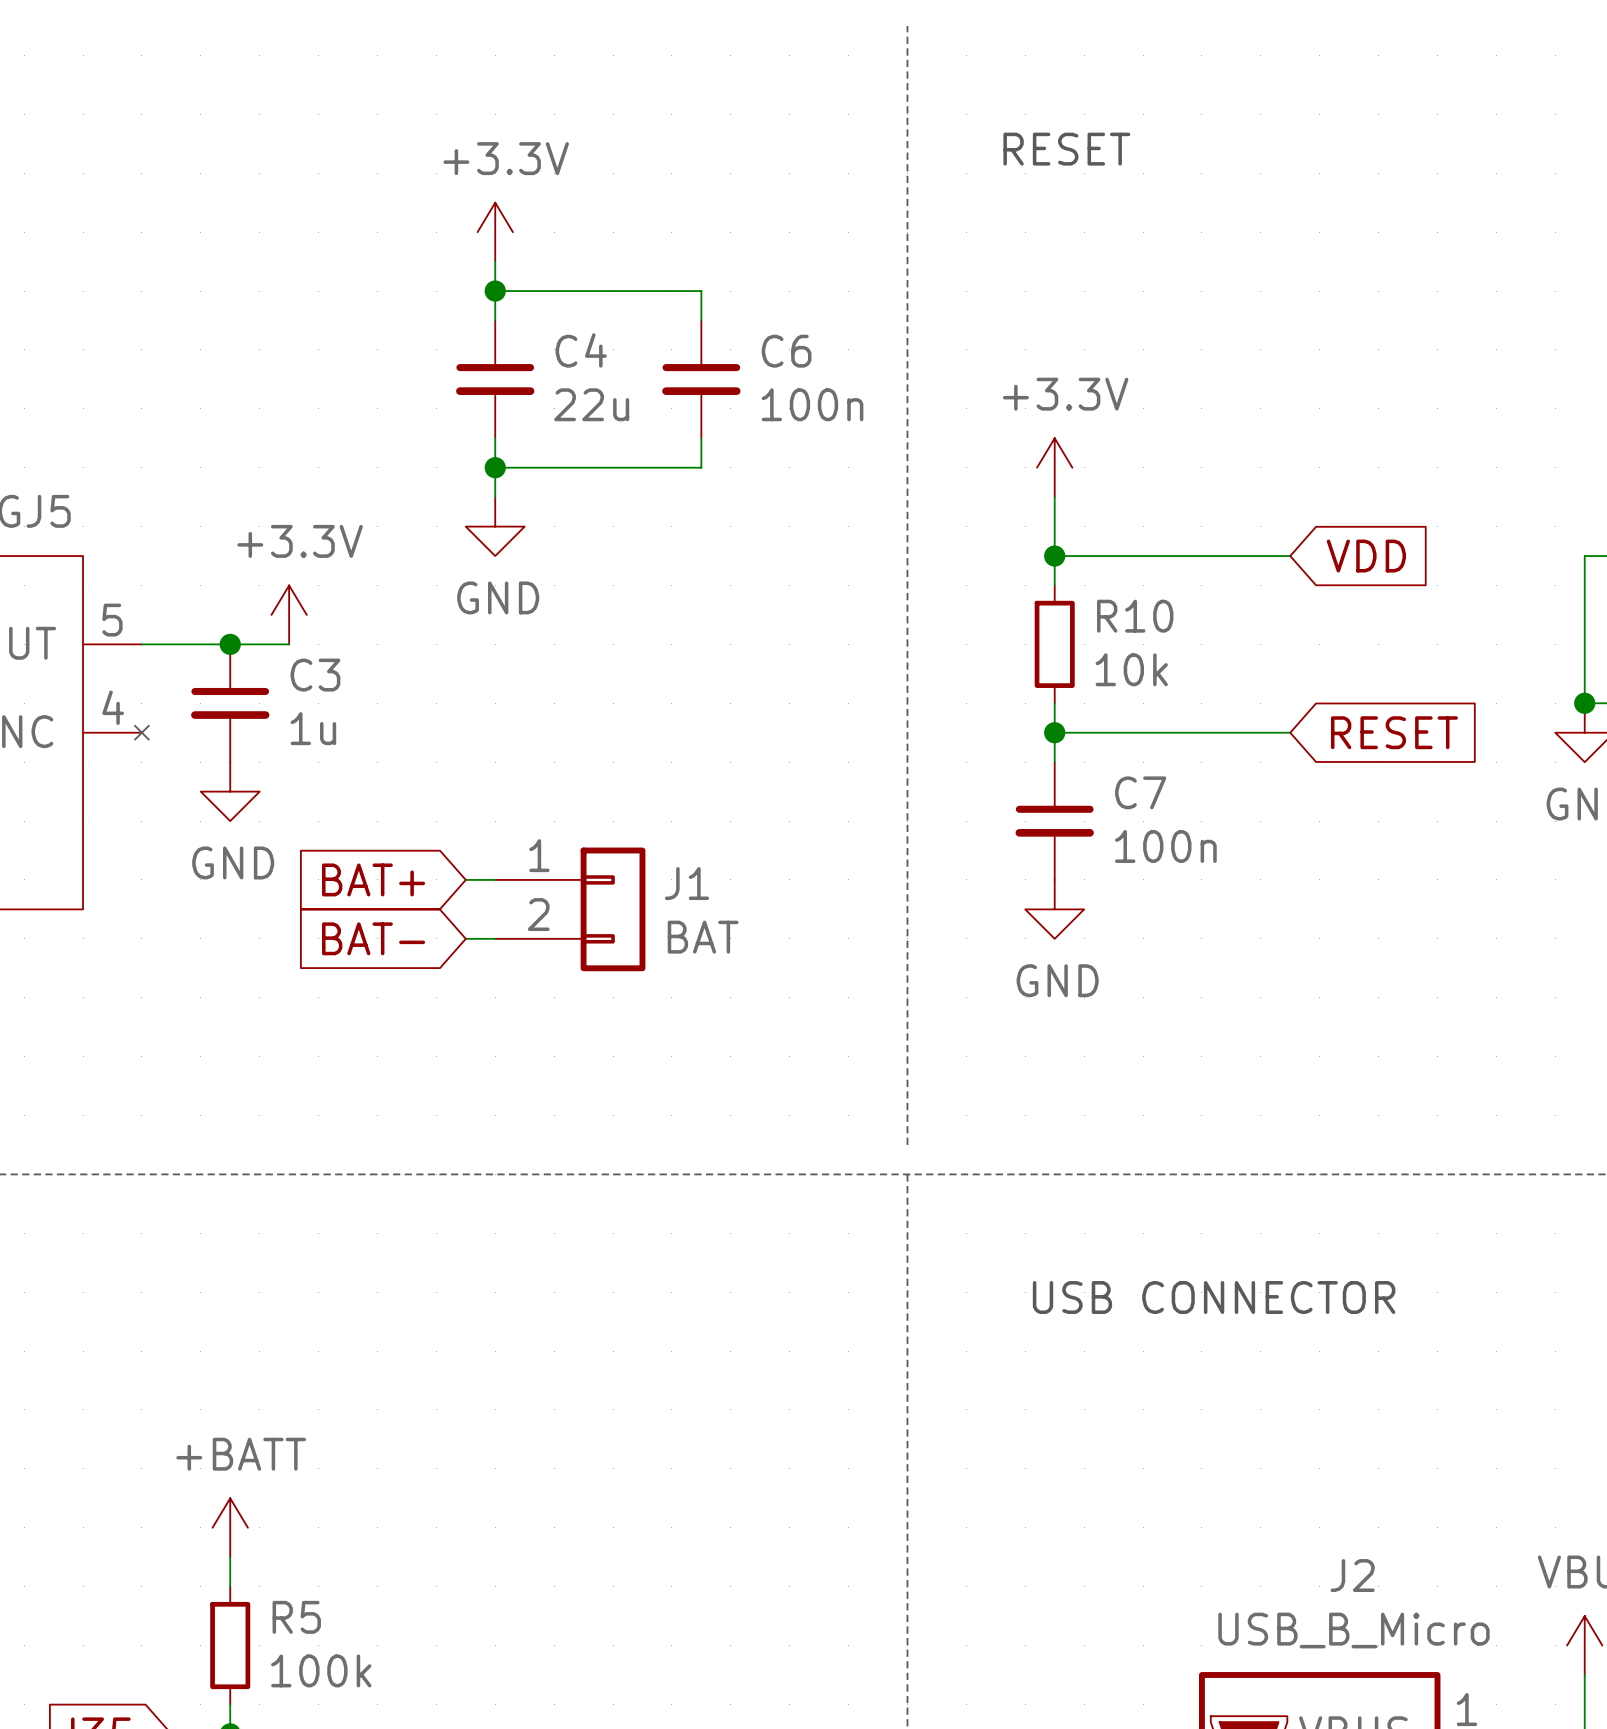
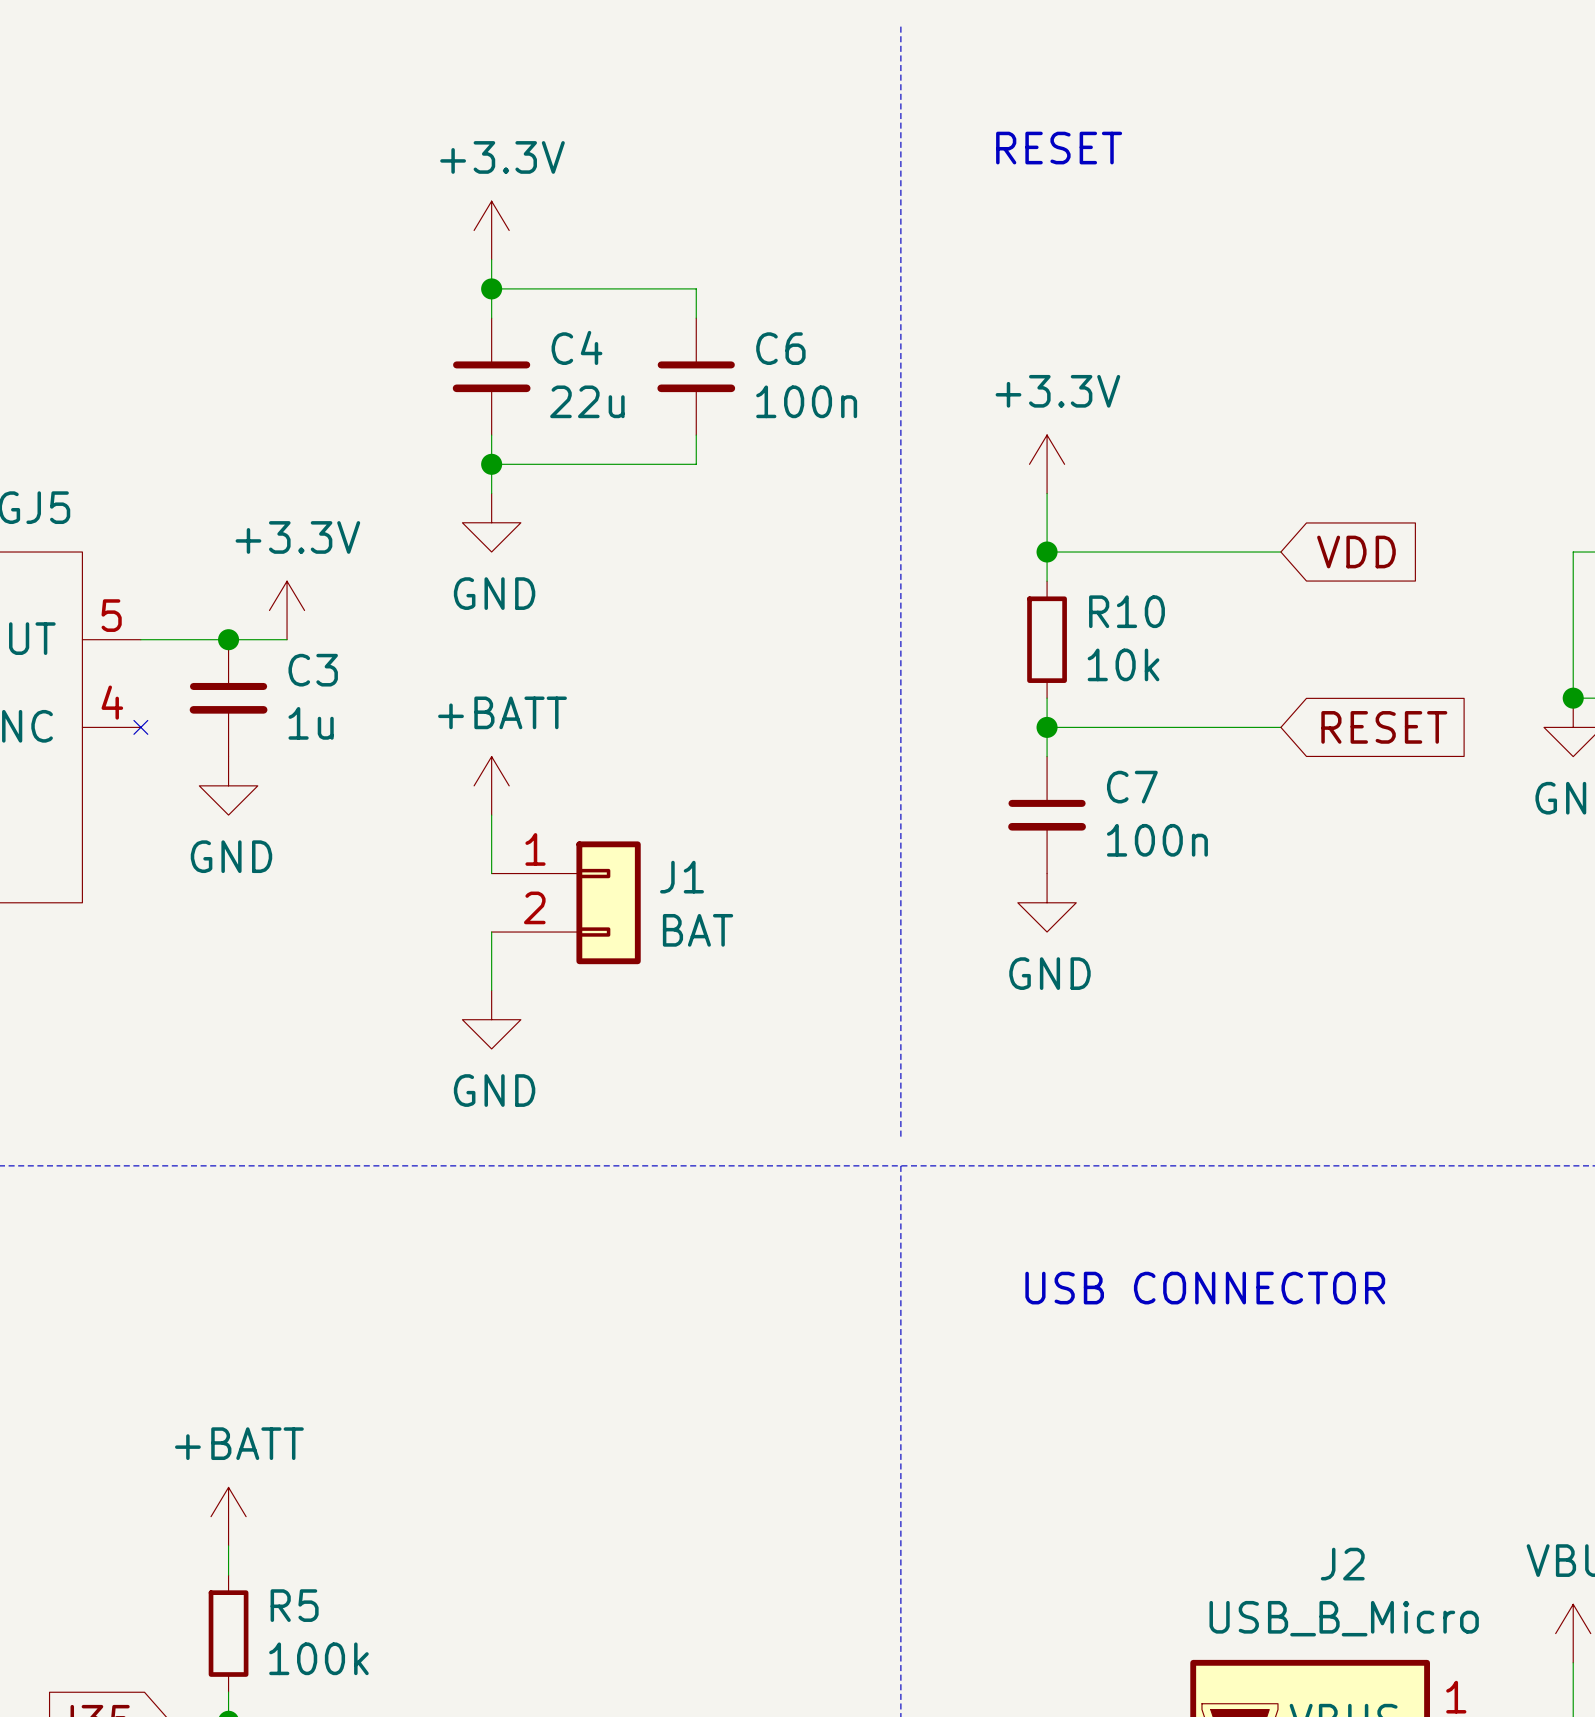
power symbol: none -> +BATT (491, 785)
global label: BAT+ (373, 879) -> none
wire: (465, 879) (495, 879) -> (491, 815) (491, 873)
global label: BAT- (373, 938) -> none
wire: (465, 938) (495, 938) -> (491, 990) (491, 932)
power symbol: none -> GND (491, 1019)

